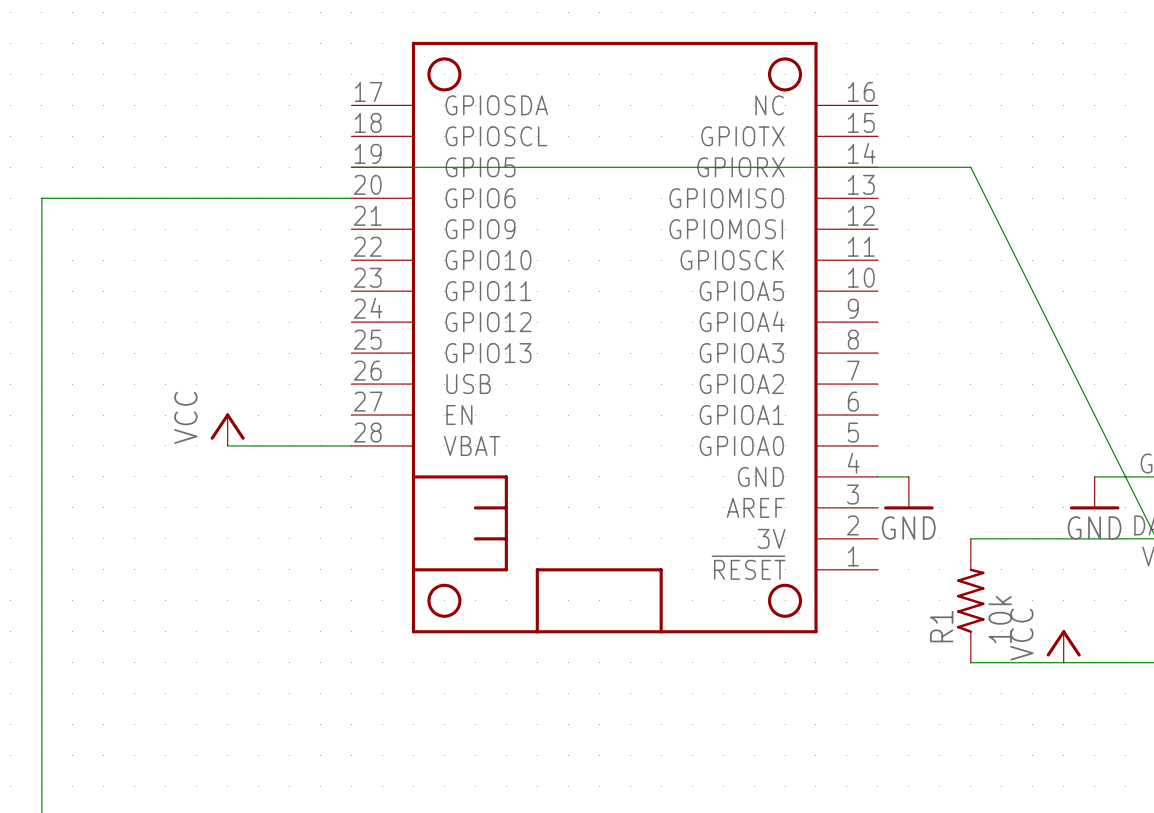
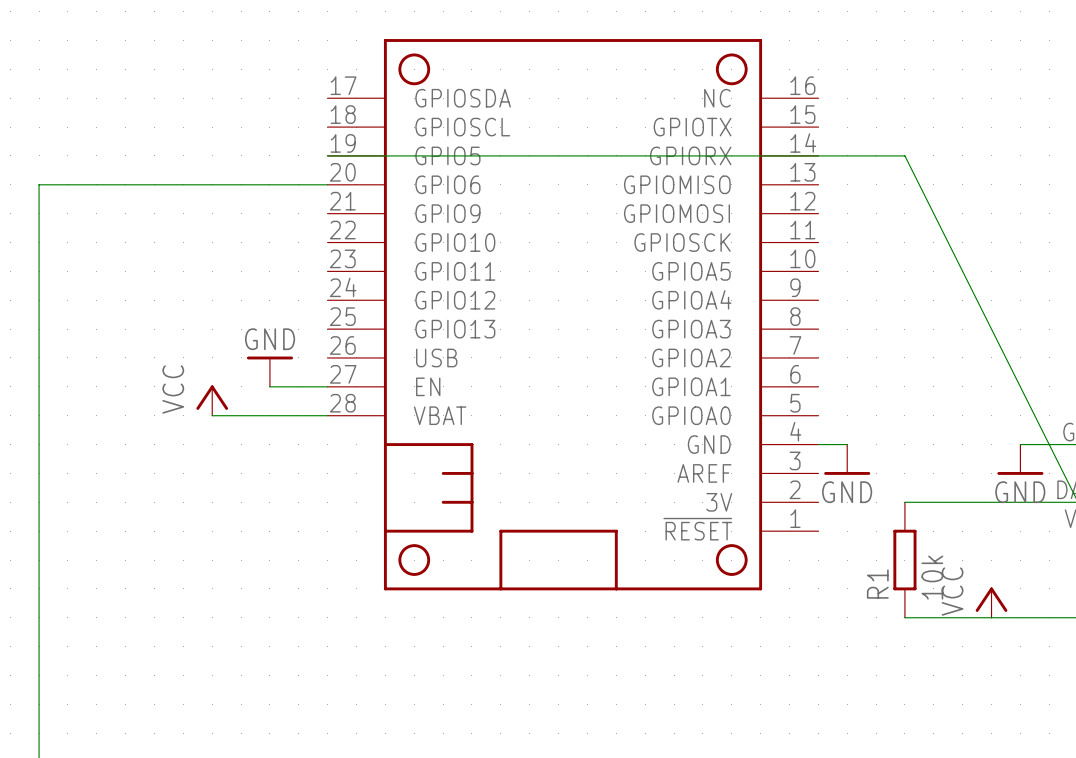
power symbol: none -> GND (269, 371)
wire: none -> (269, 386) (327, 386)
R1 symbol: [957, 538, 985, 663] -> [893, 502, 917, 618]

